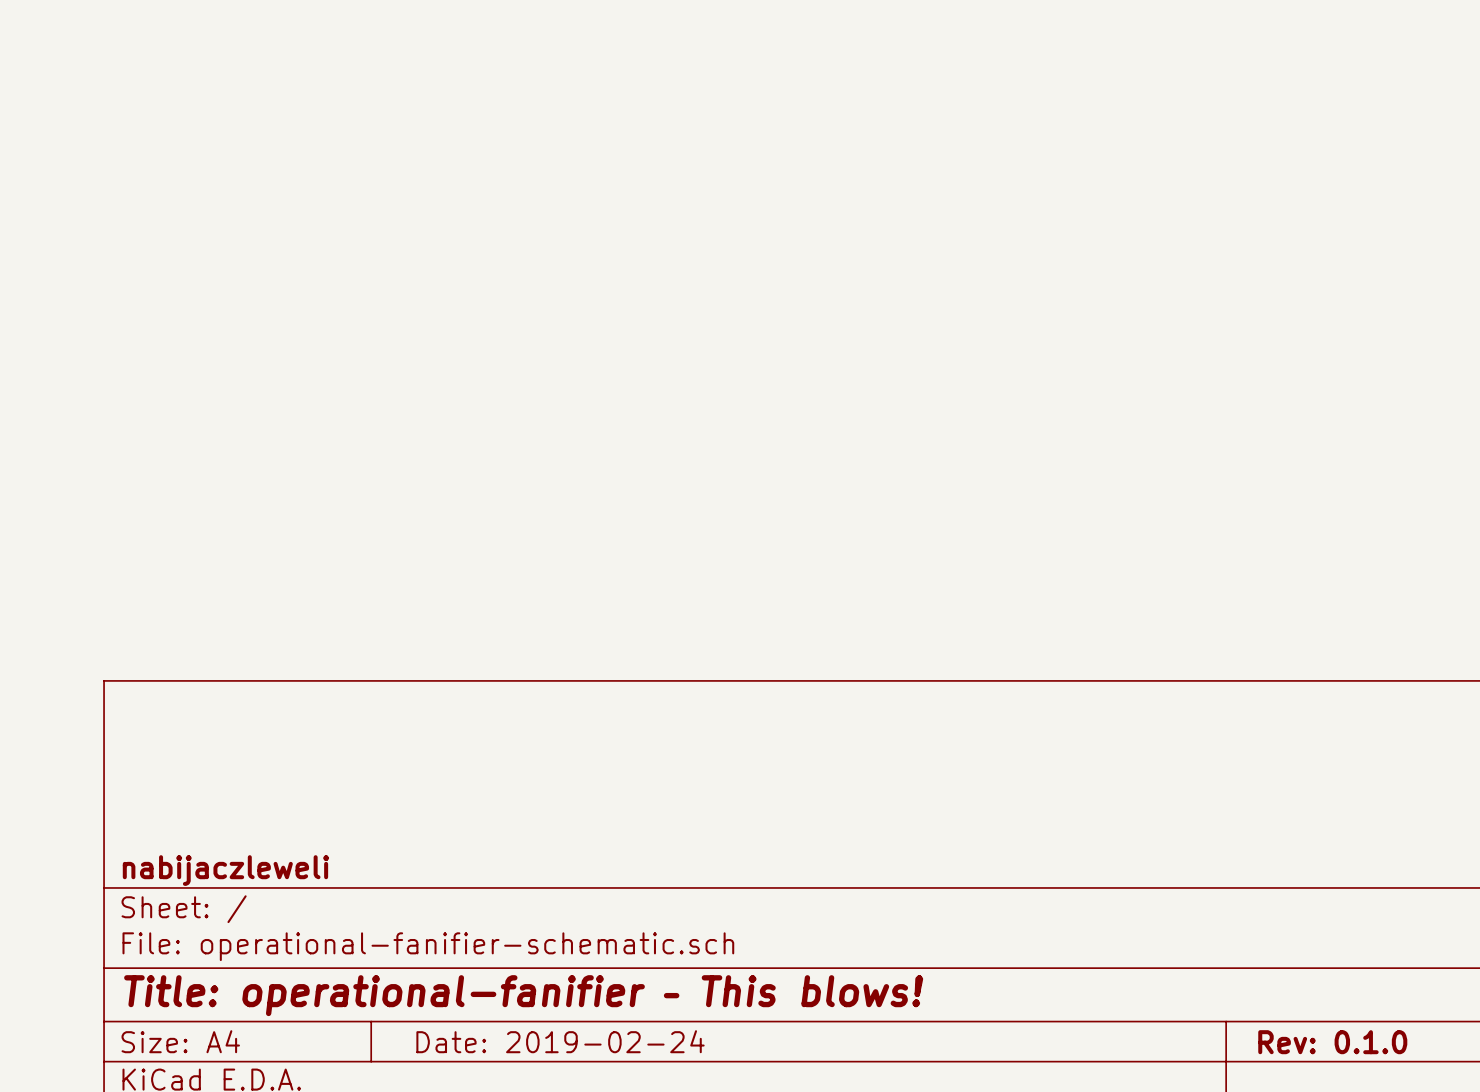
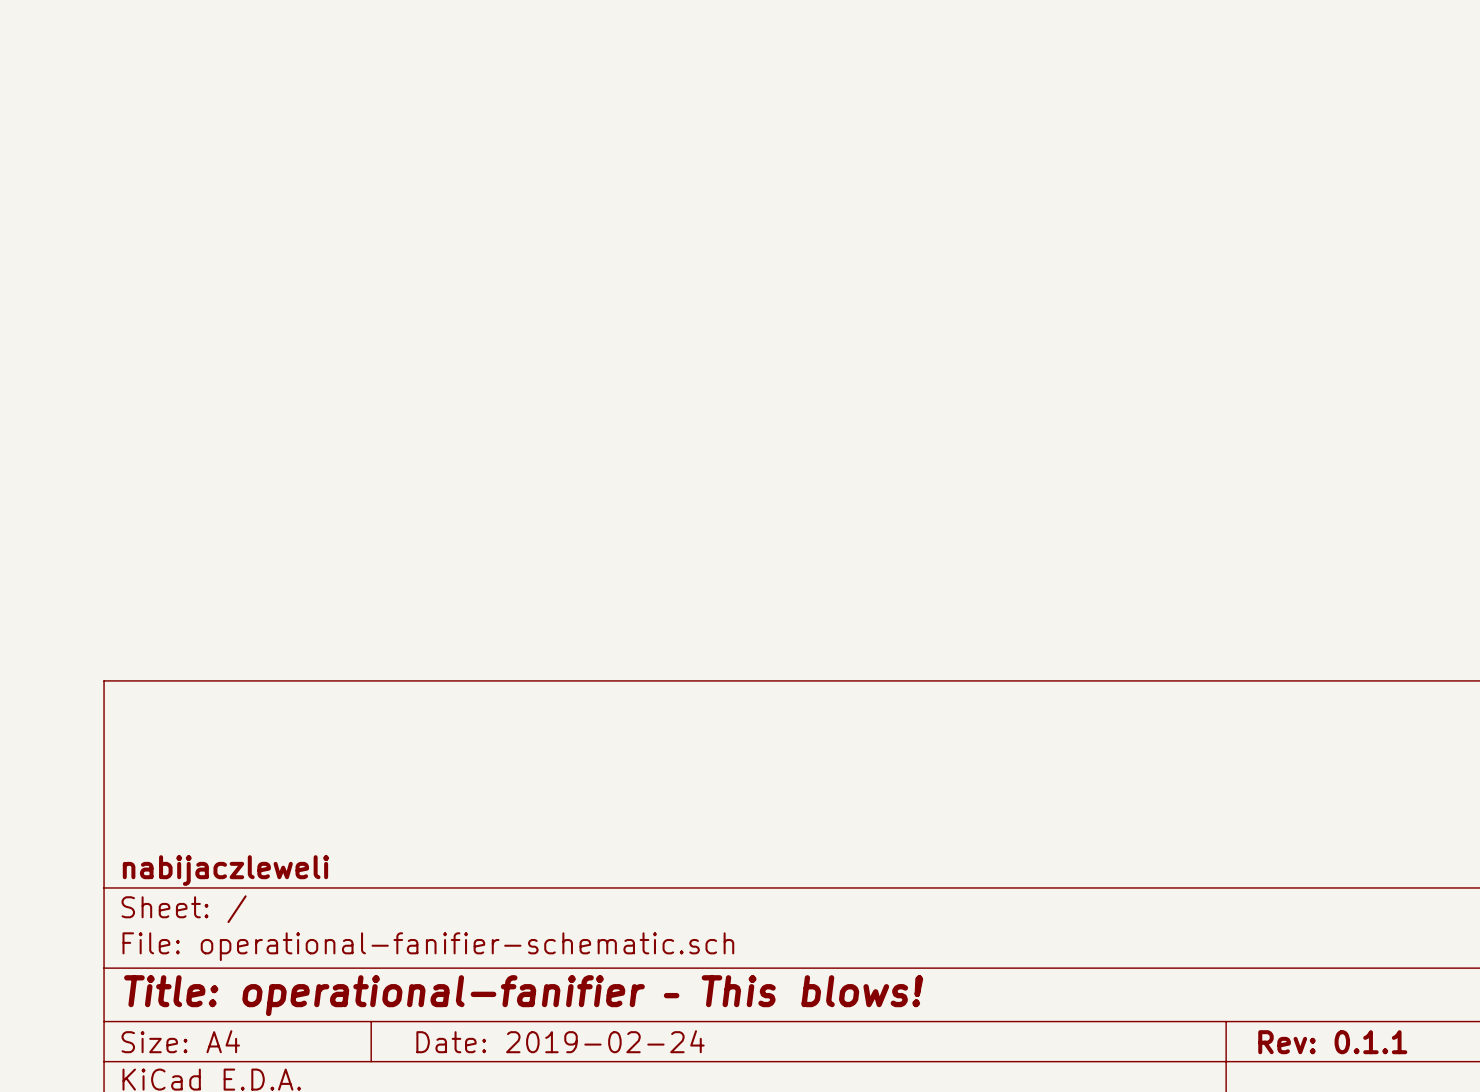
title block: Rev: 0.1.0 (1332, 1042) -> Rev: 0.1.1 (1332, 1042)

